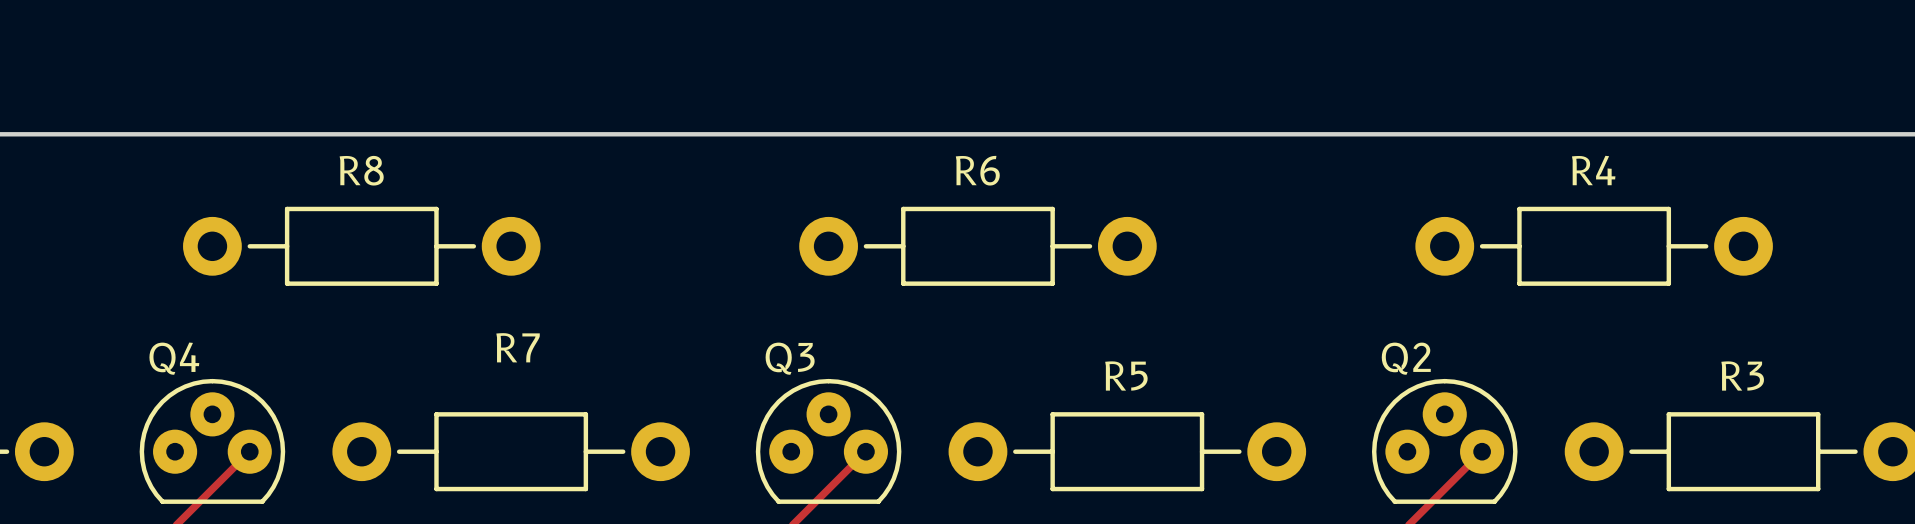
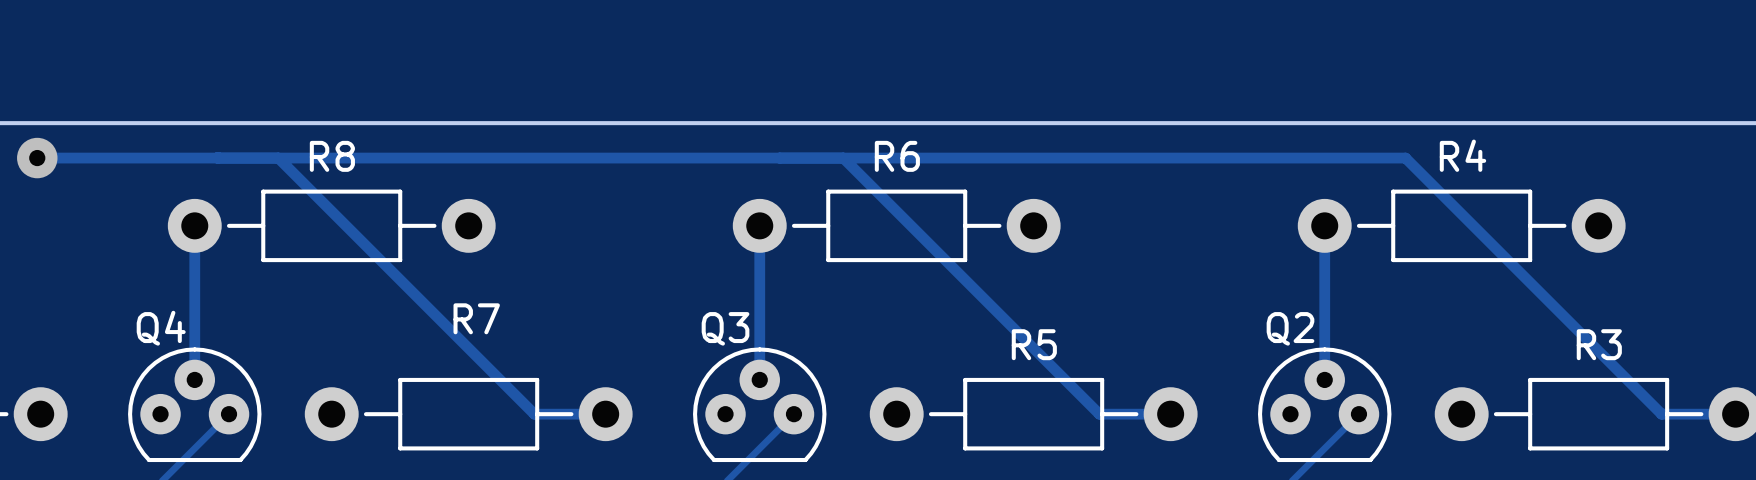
track: none -> (37, 158) (1405, 158) (1661, 414) (1735, 414)
via: none -> (37, 158)
track: none -> (278, 158) (534, 414) (605, 414)
track: none -> (843, 158) (1099, 414) (1170, 414)
track: none -> (194, 225) (194, 379)
track: none -> (759, 225) (759, 379)
track: none -> (1324, 225) (1324, 379)

